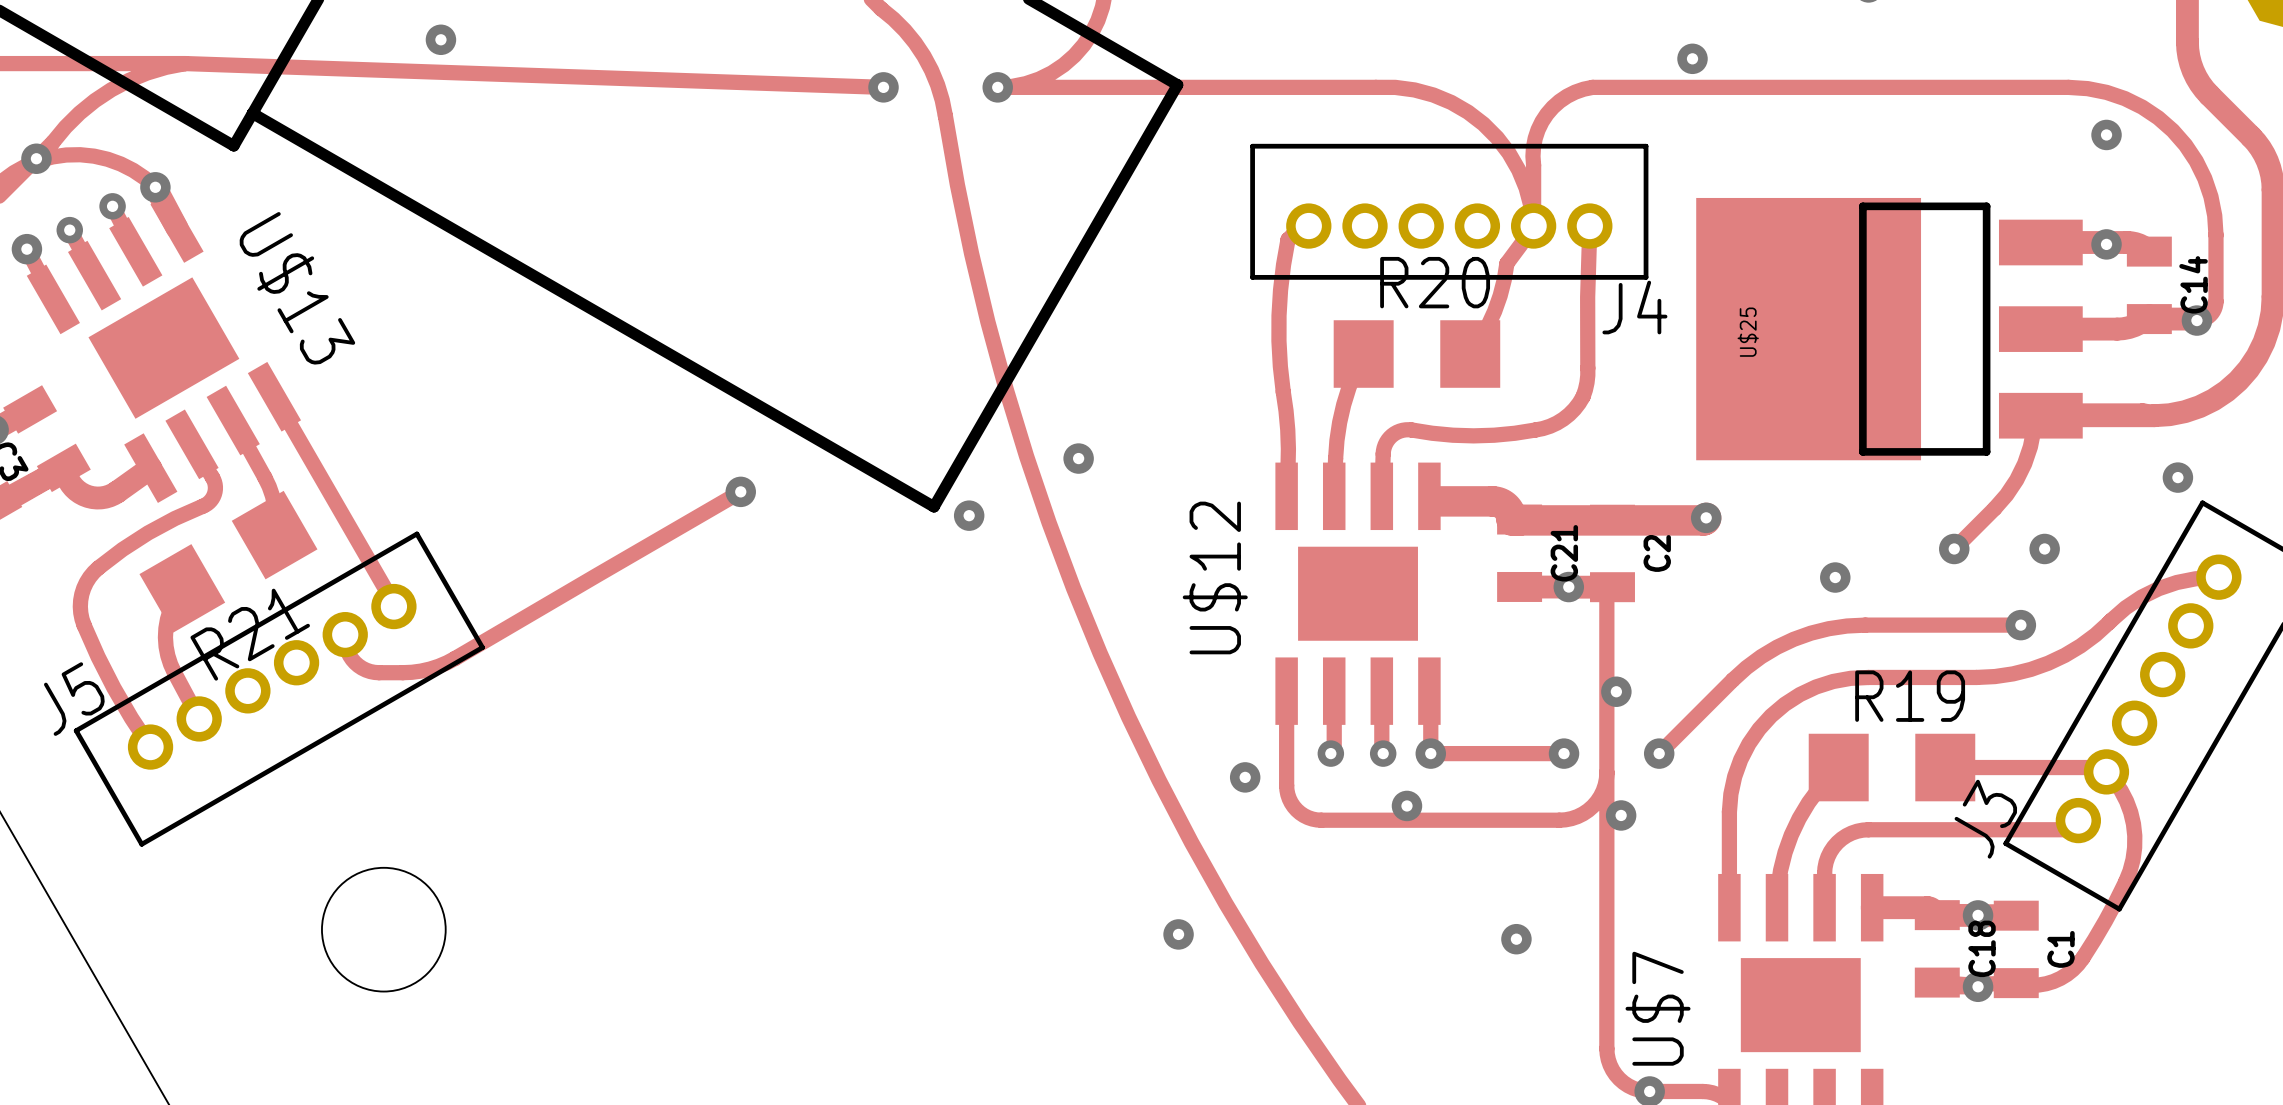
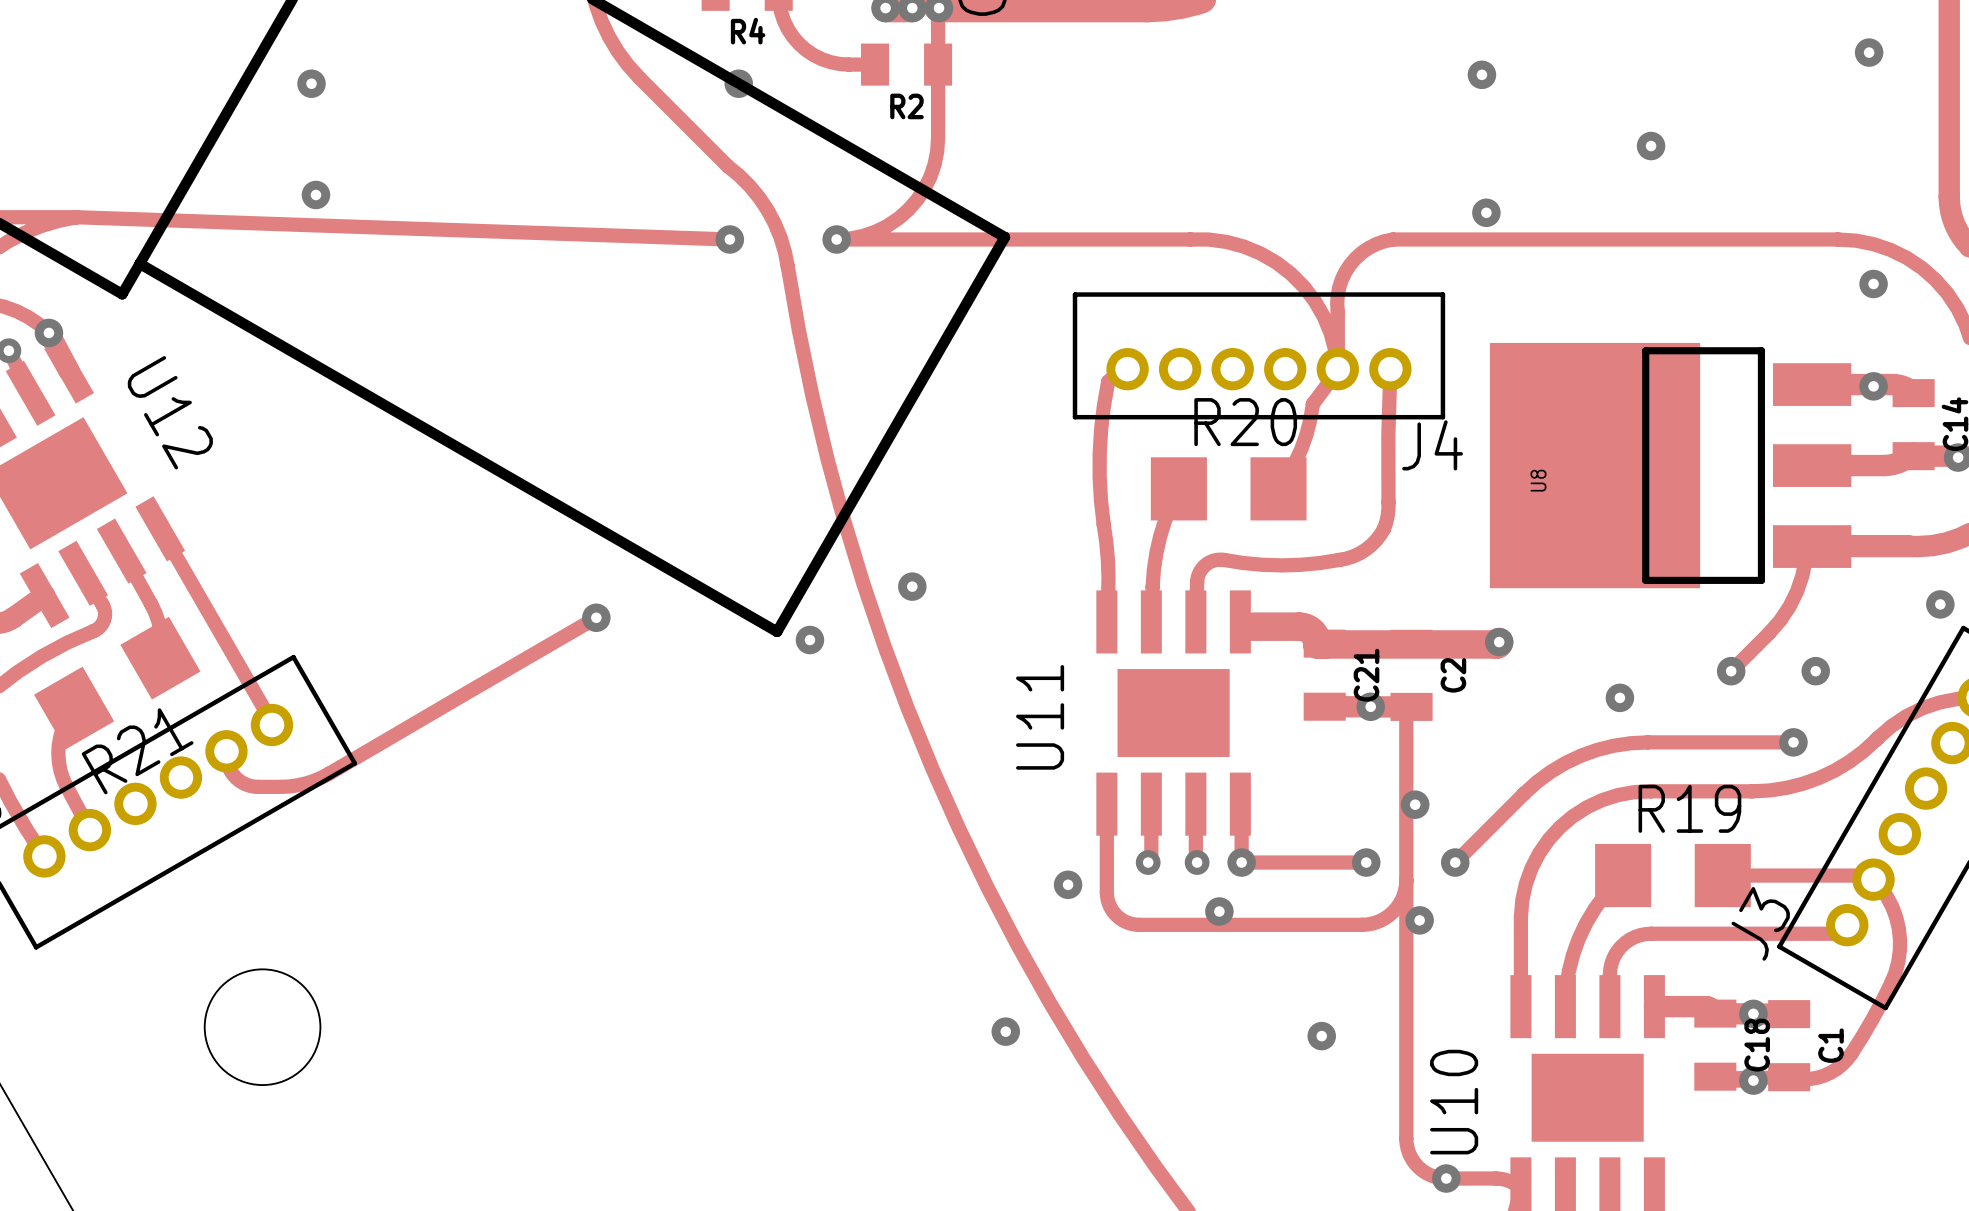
U$13 name: U$13 (297, 288) -> U12 (170, 412)
U$25 name: U$25 (1748, 332) -> U8 (1538, 480)
U$12 name: U$12 (1215, 577) -> U11 (1040, 717)
U$7 name: U$7 (1658, 1008) -> U10 (1454, 1102)

